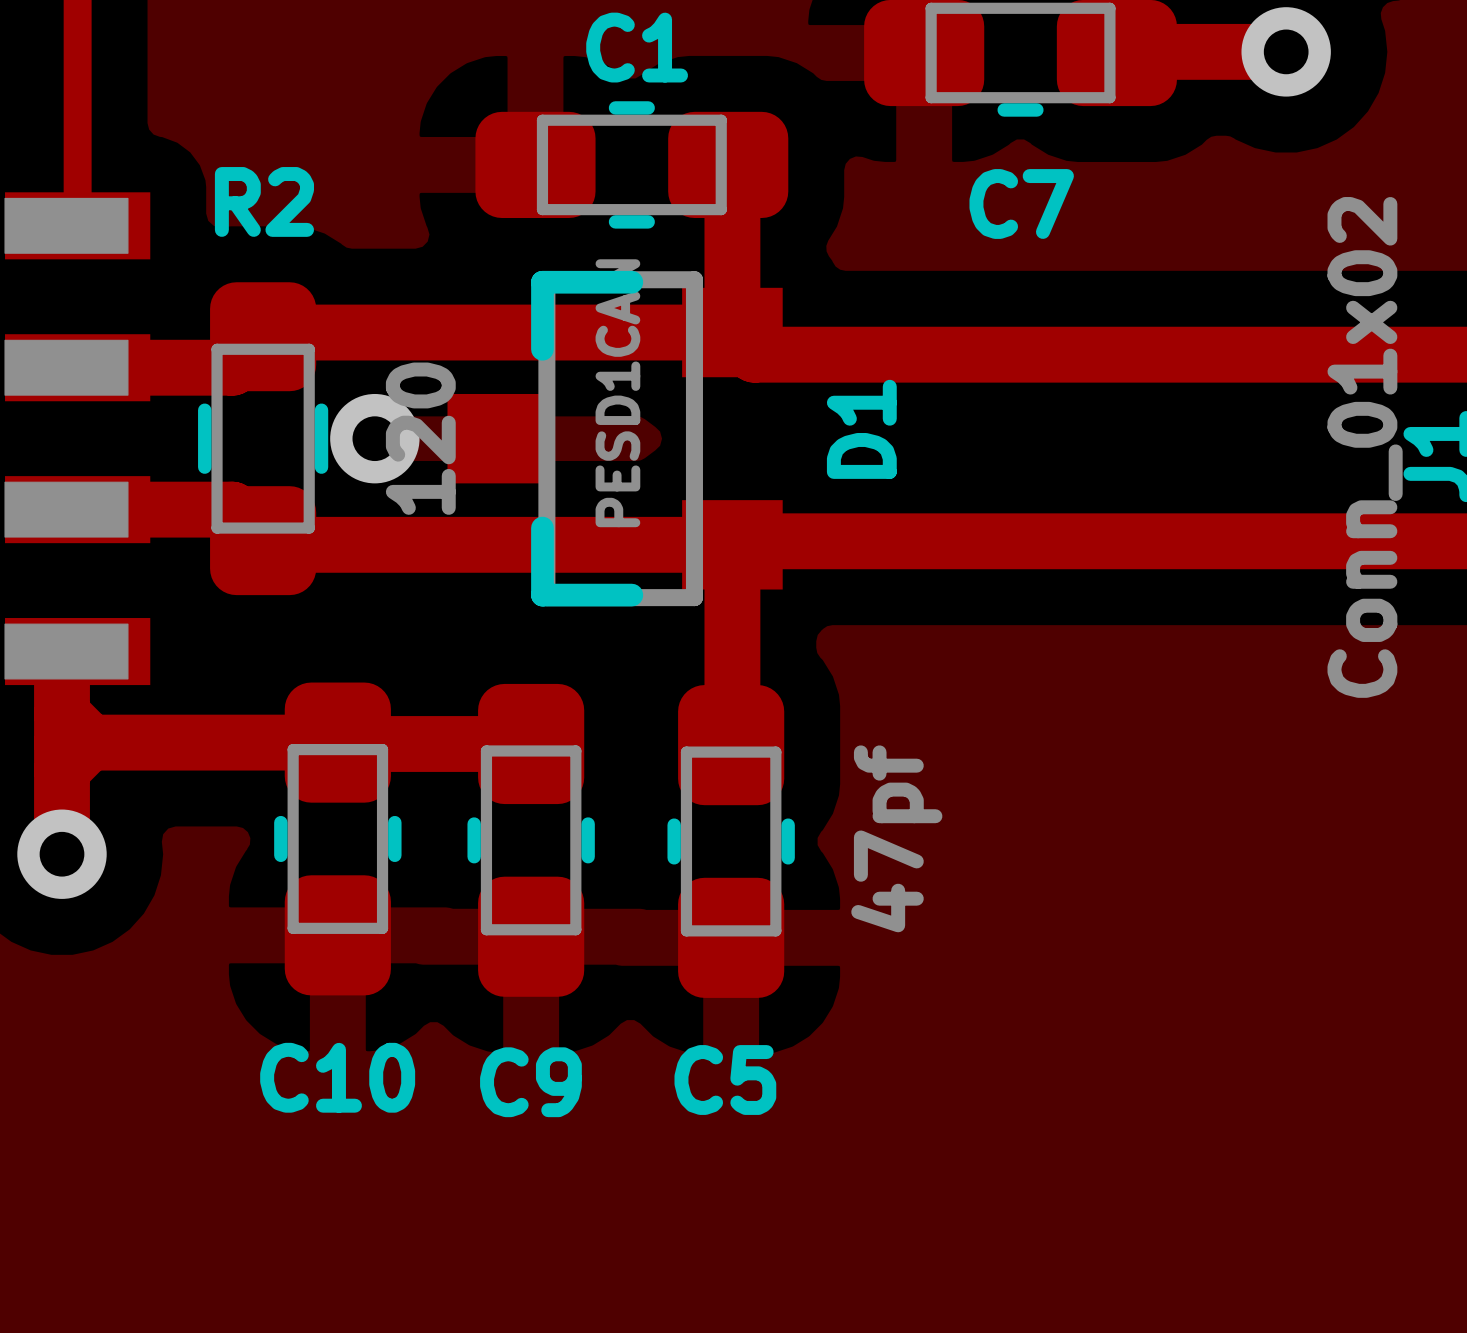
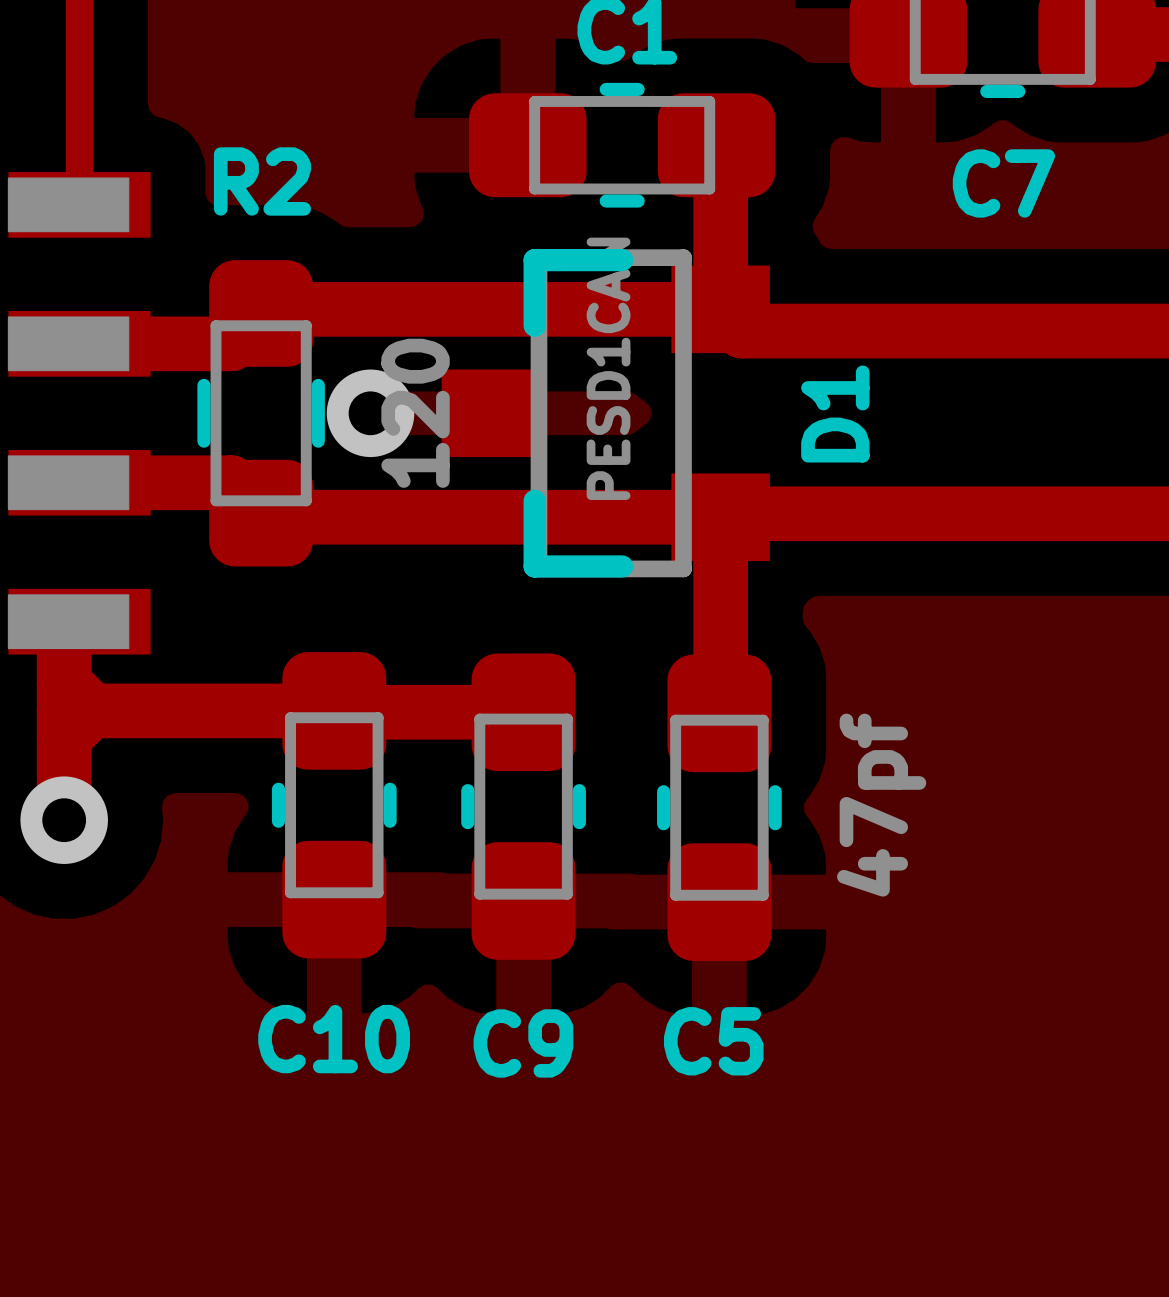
D1 name position: D1 (861, 429) -> D1 (835, 413)

